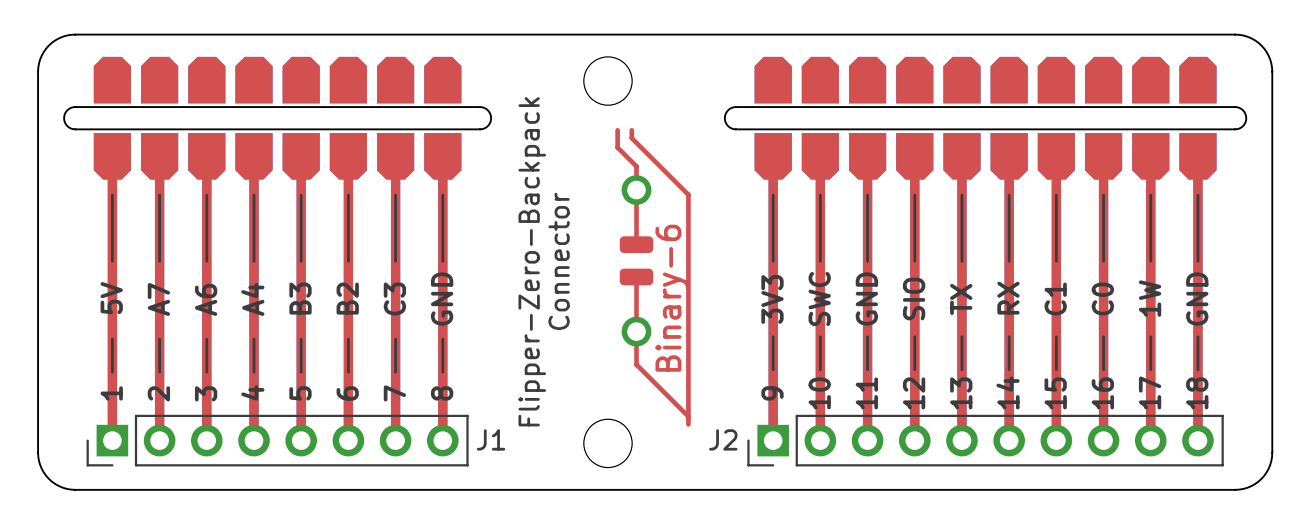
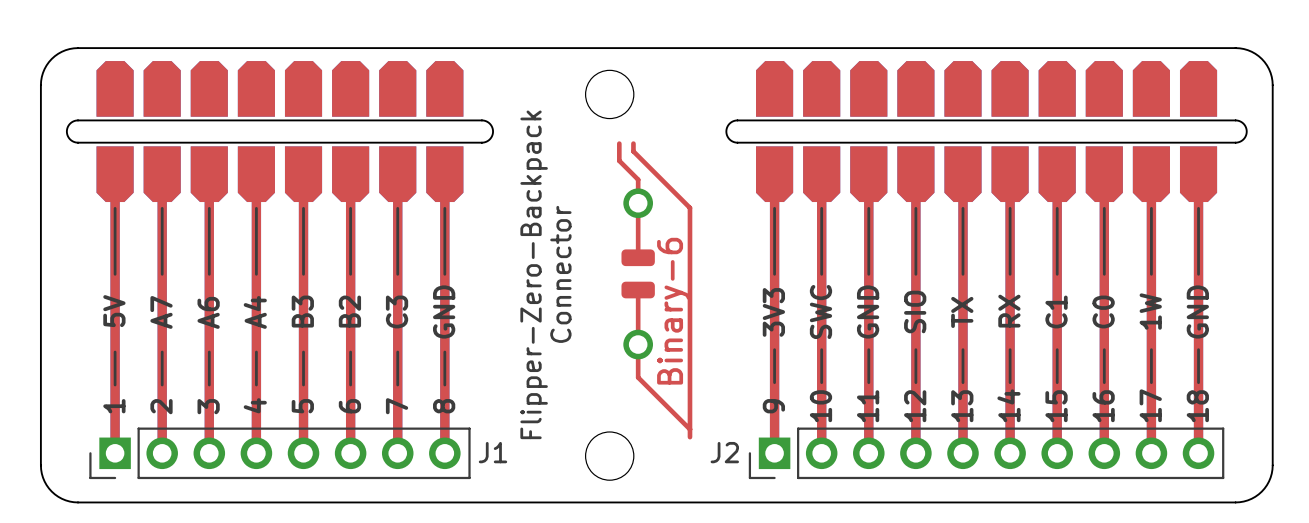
part footprint: [93, 56, 131, 180] -> [96, 61, 134, 203]
part footprint: [141, 56, 179, 180] -> [143, 61, 181, 203]
part footprint: [188, 56, 226, 180] -> [190, 61, 228, 203]
part footprint: [235, 56, 273, 180] -> [237, 61, 275, 203]
part footprint: [282, 56, 320, 180] -> [284, 61, 323, 203]
part footprint: [329, 56, 367, 180] -> [332, 61, 370, 203]
part footprint: [377, 56, 415, 180] -> [379, 61, 417, 203]
part footprint: [424, 56, 462, 180] -> [426, 61, 464, 203]
part footprint: [754, 56, 792, 180] -> [756, 61, 794, 203]
part footprint: [801, 56, 839, 180] -> [803, 61, 841, 203]
part footprint: [848, 56, 887, 180] -> [850, 61, 888, 203]
part footprint: [896, 56, 934, 180] -> [897, 61, 935, 203]
part footprint: [943, 56, 981, 180] -> [944, 61, 982, 203]
part footprint: [990, 56, 1028, 180] -> [991, 61, 1029, 203]
part footprint: [1037, 56, 1075, 180] -> [1038, 61, 1076, 203]
part footprint: [1084, 56, 1123, 180] -> [1085, 61, 1123, 203]
part footprint: [1132, 56, 1170, 180] -> [1132, 61, 1170, 203]
part footprint: [1179, 56, 1217, 180] -> [1179, 61, 1218, 203]

